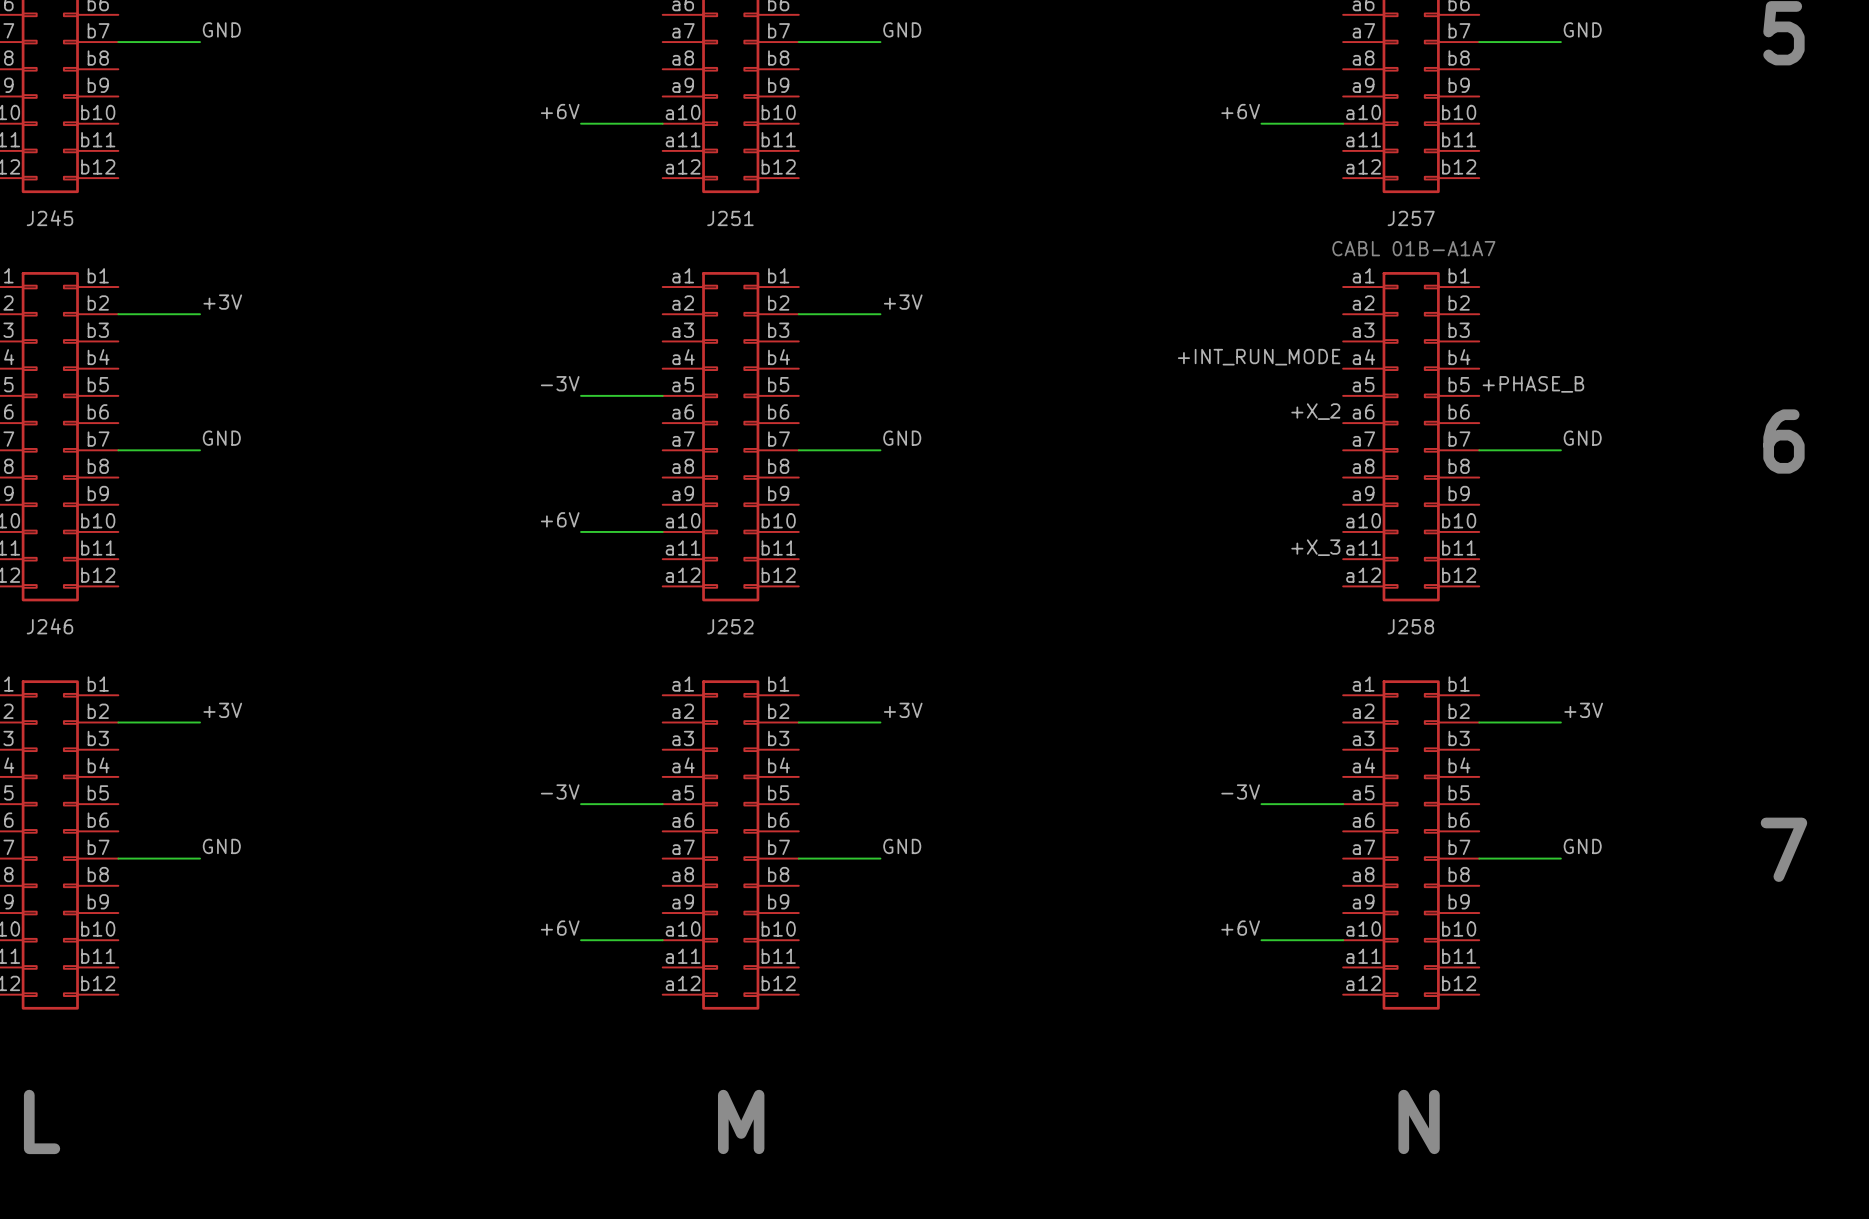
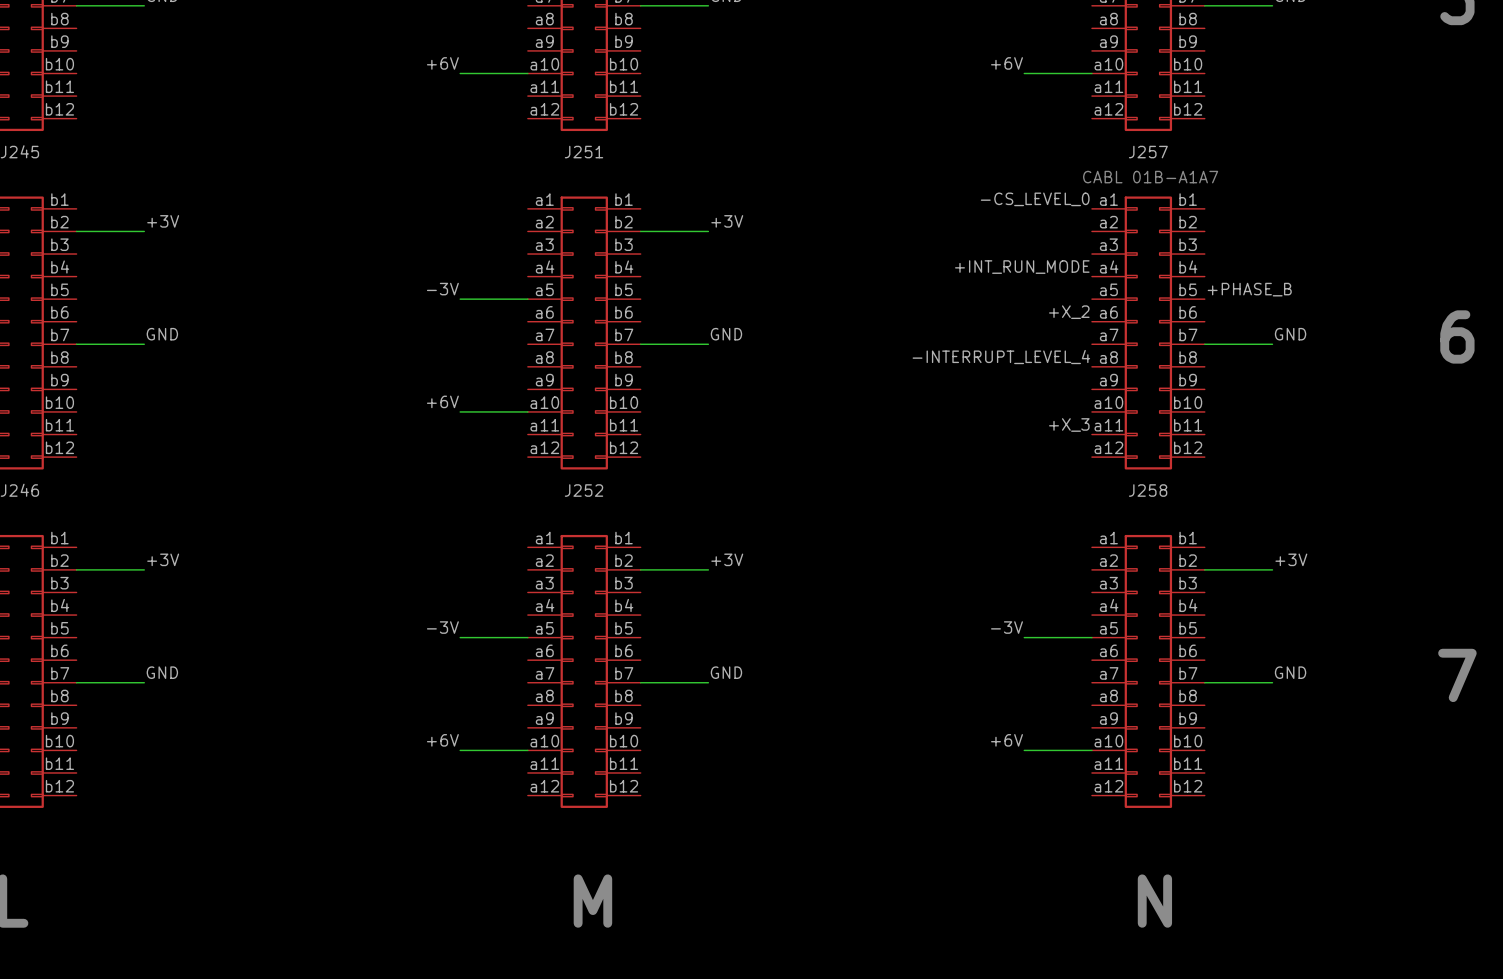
label: none -> -CS_LEVEL_0 (1035, 199)
label: none -> -INTERRUPT_LEVEL_4 (1001, 357)

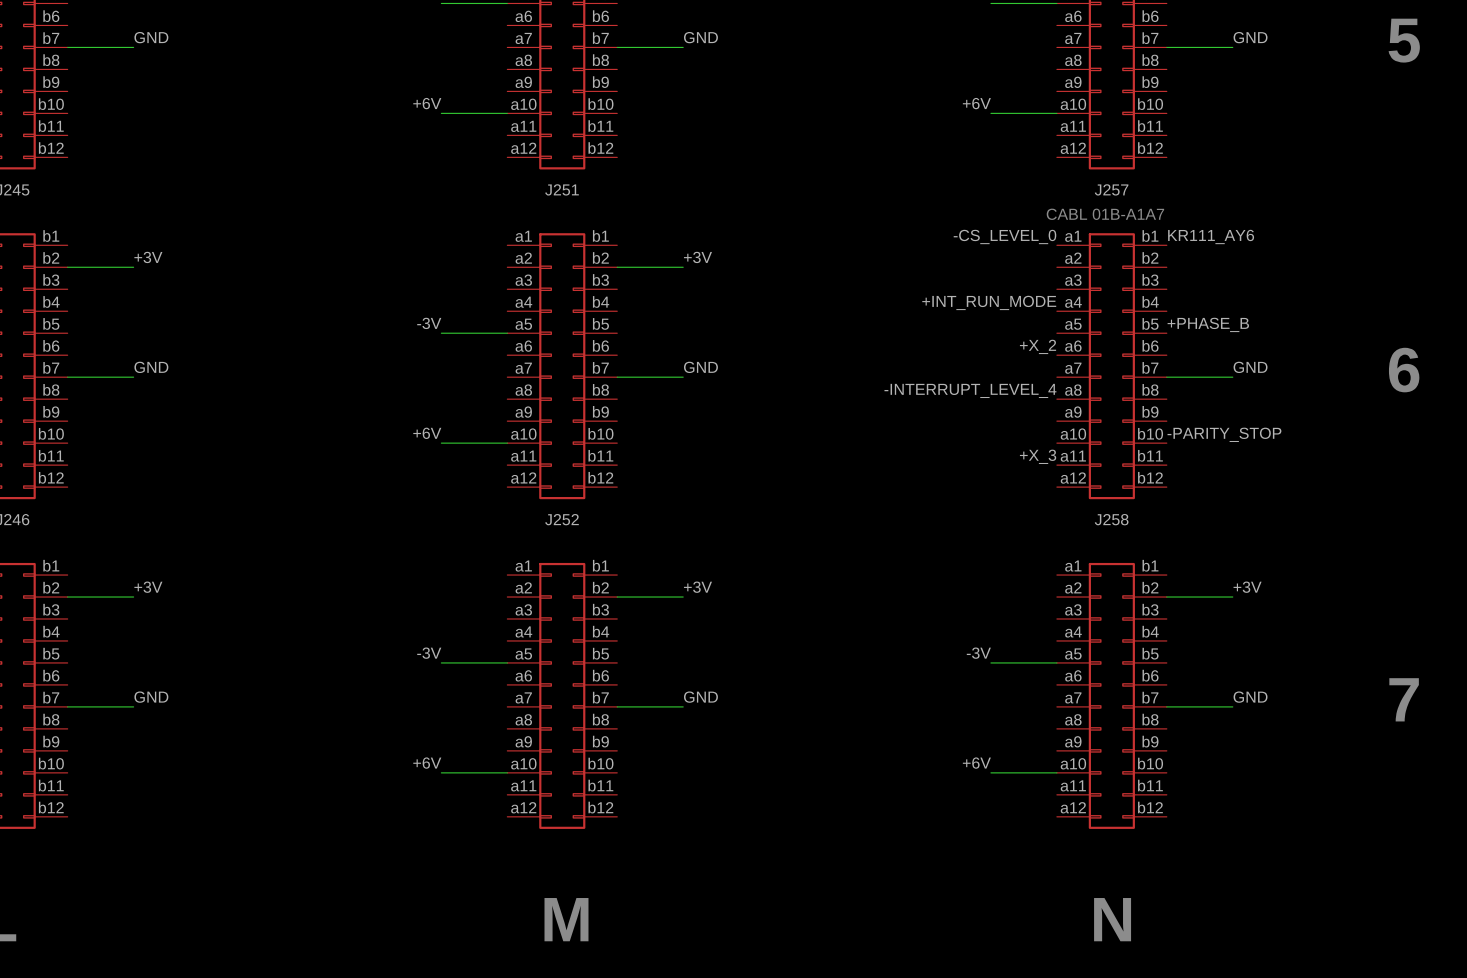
label: none -> KR111_AY6 (1211, 236)
label: none -> -PARITY_STOP (1224, 434)

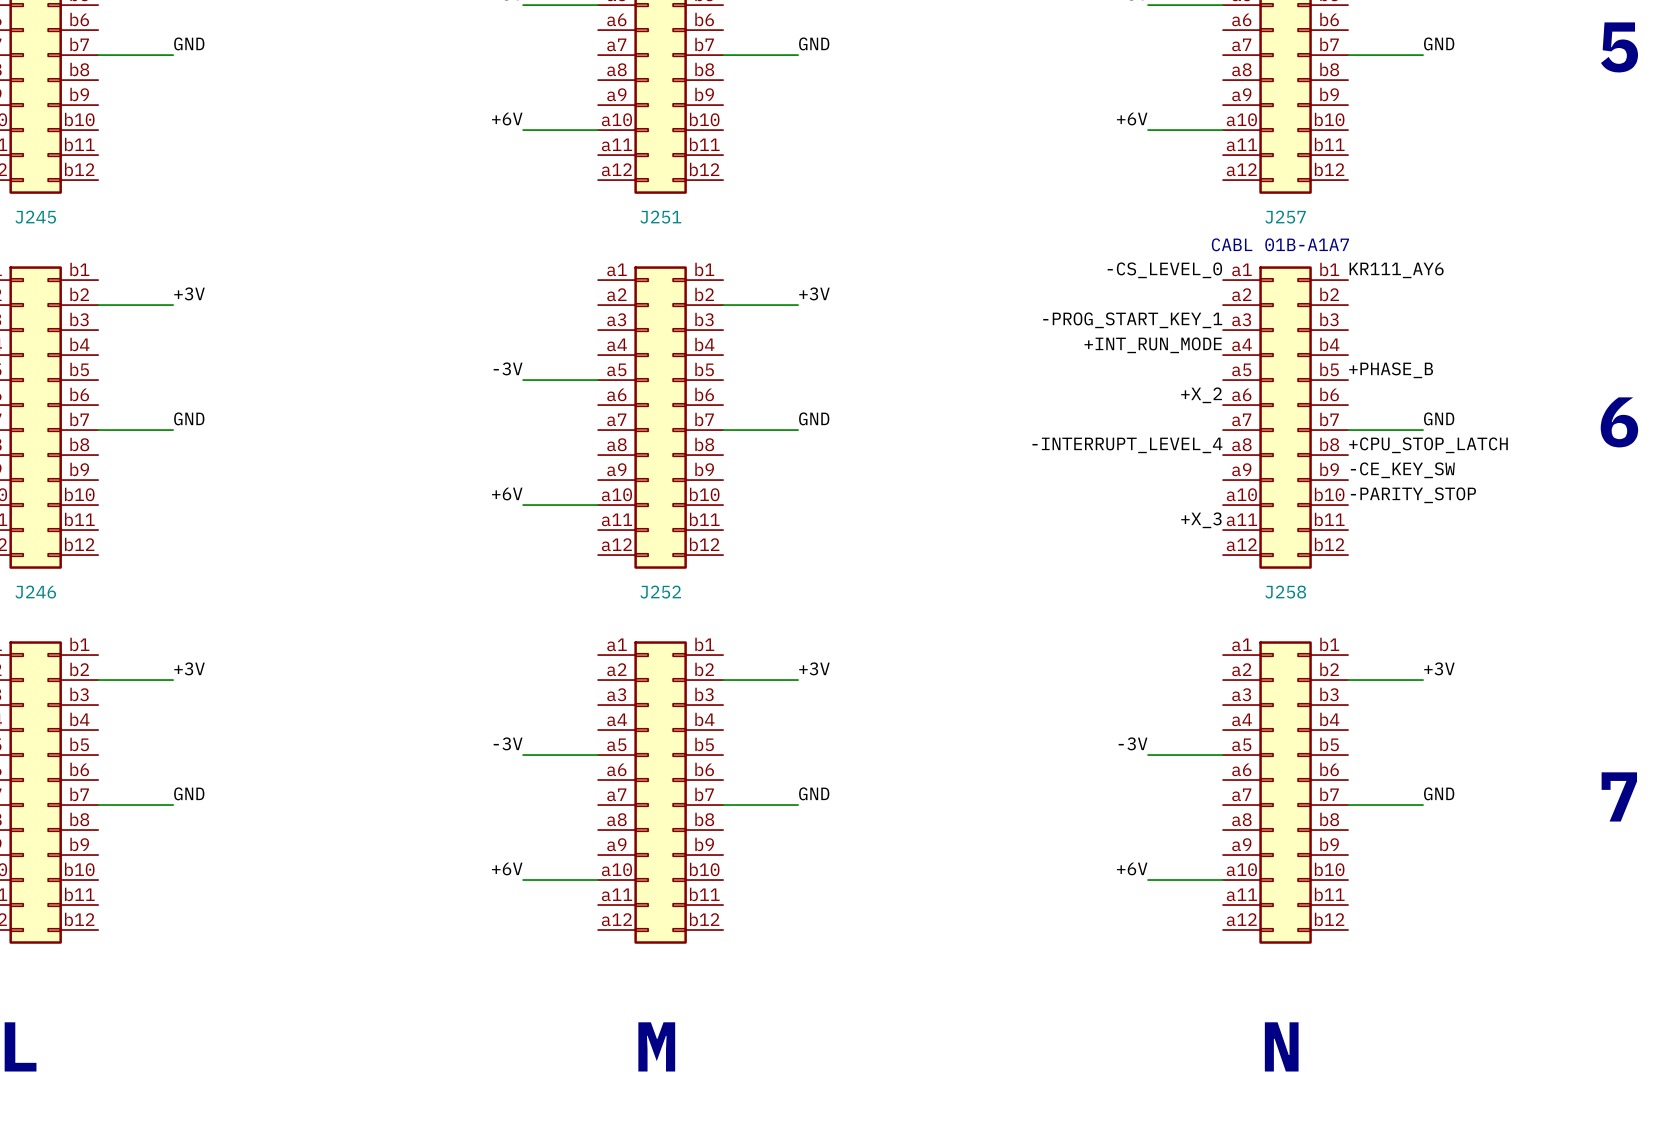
label: none -> -PROG_START_KEY_1 (1132, 320)
label: none -> +CPU_STOP_LATCH (1428, 445)
label: none -> -CE_KEY_SW (1402, 470)

